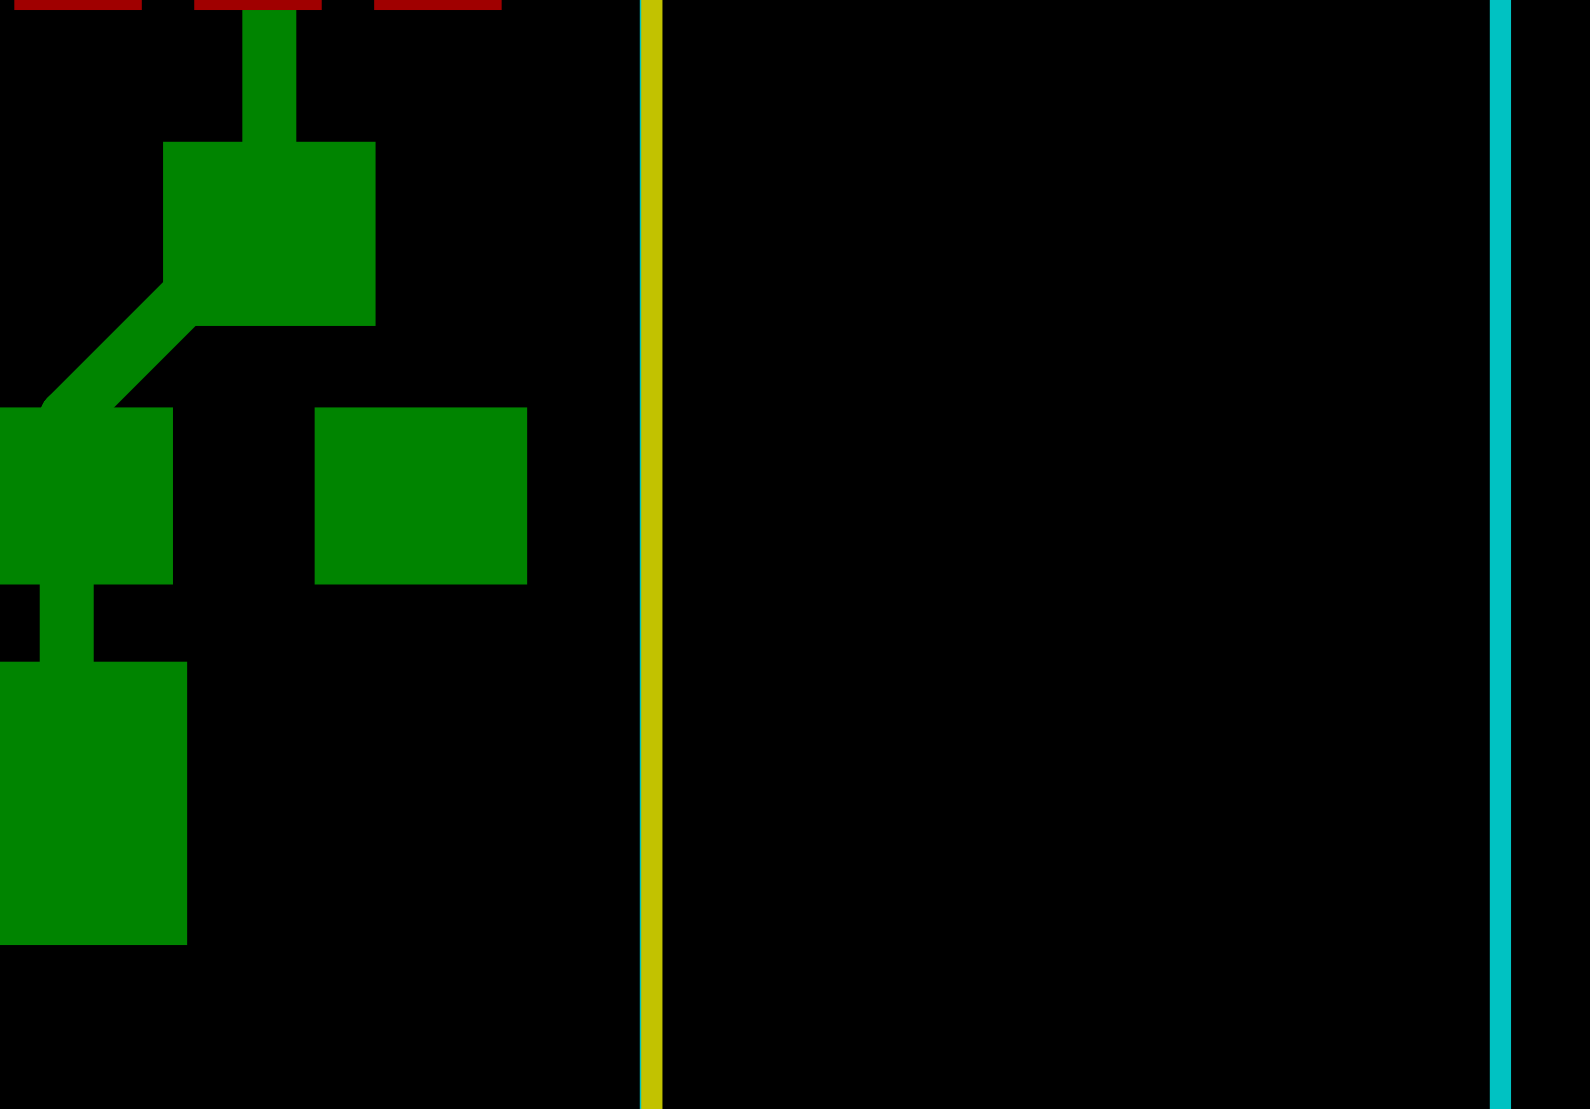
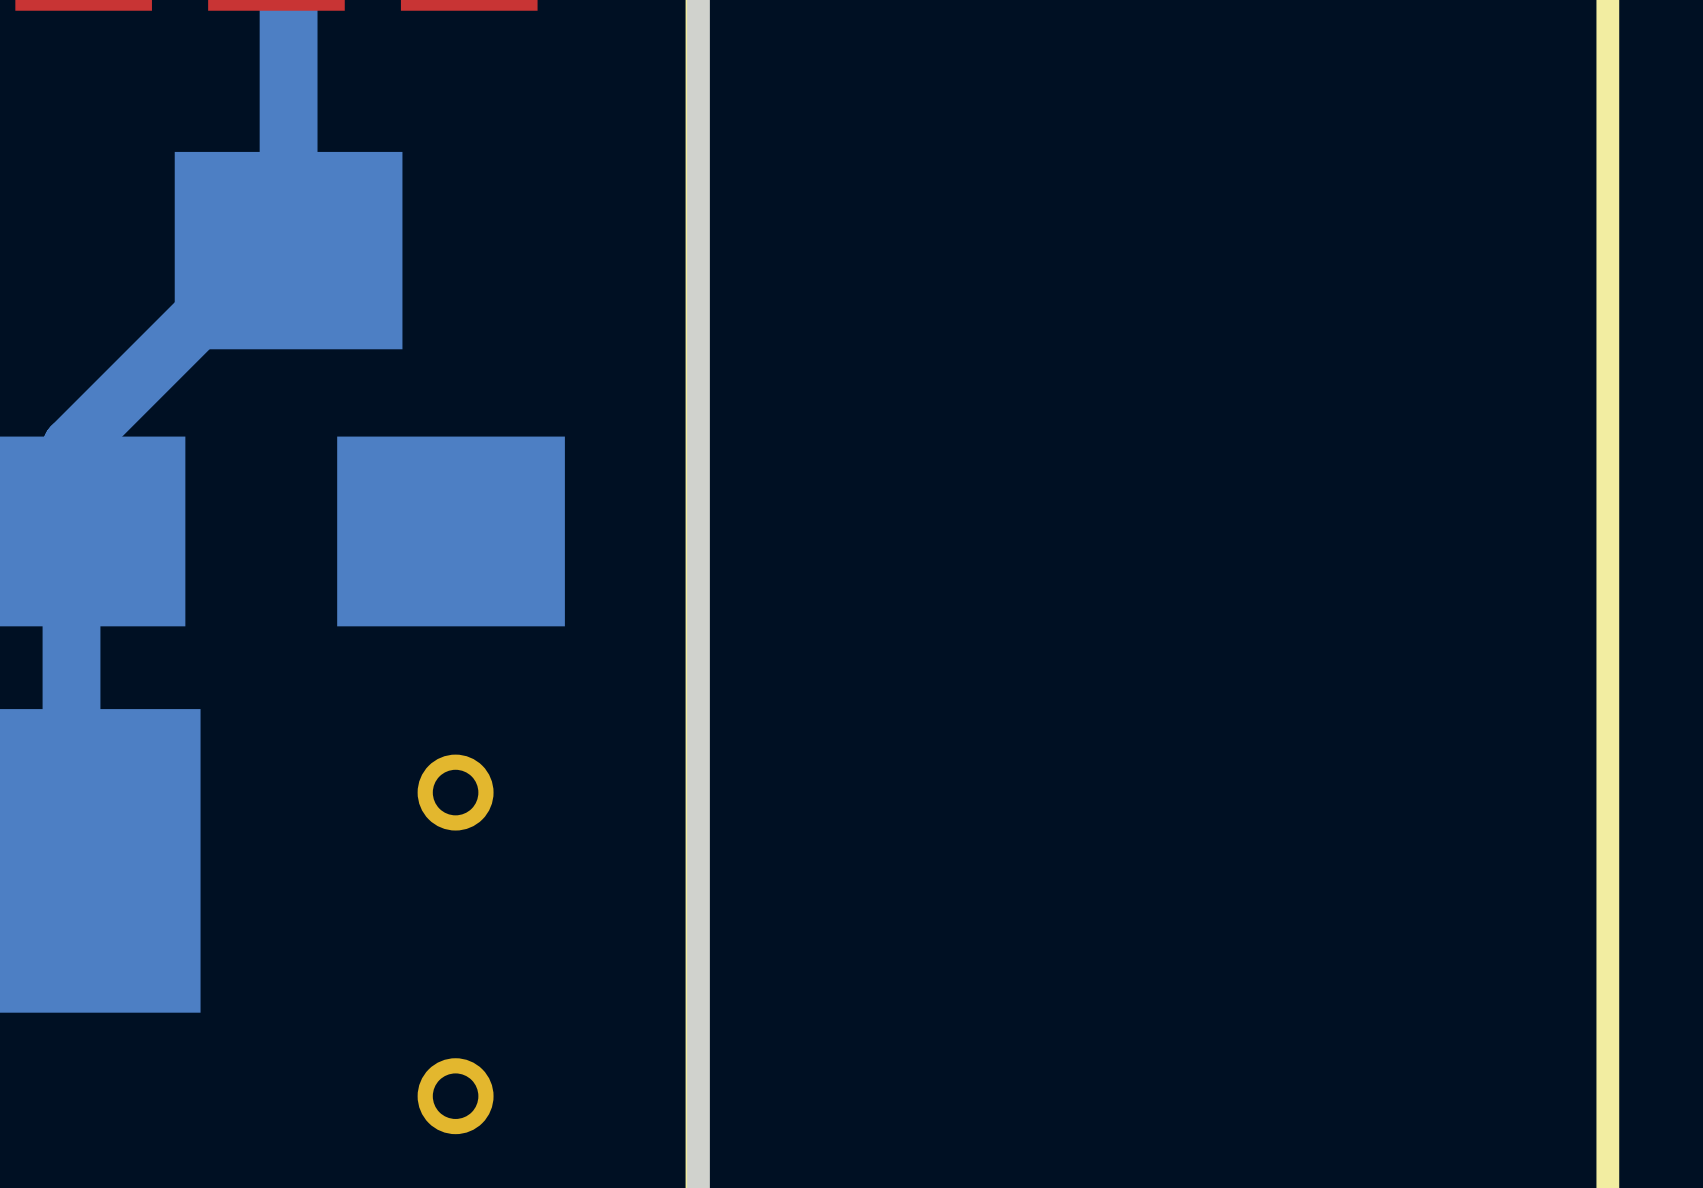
part: none -> (455, 792)
part: none -> (455, 1096)

